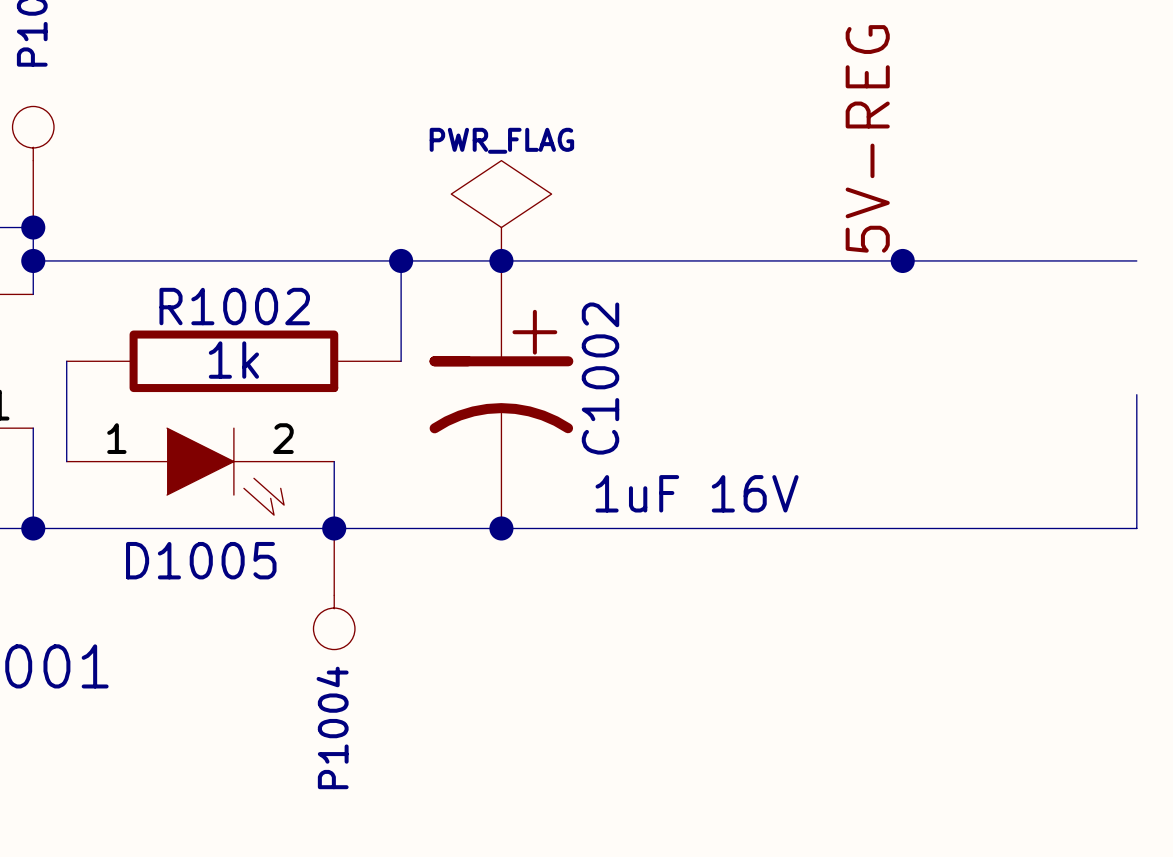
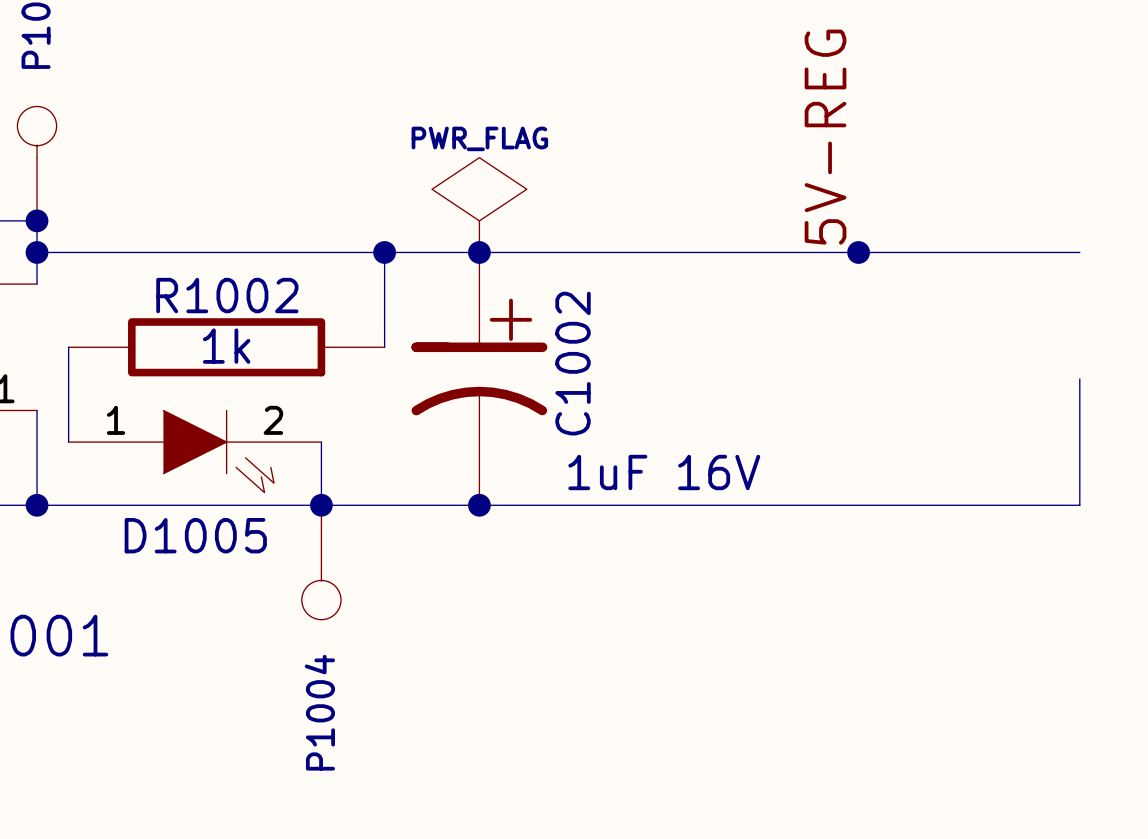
P1004 name position: P1004 (332, 727) -> P1004 (319, 712)

